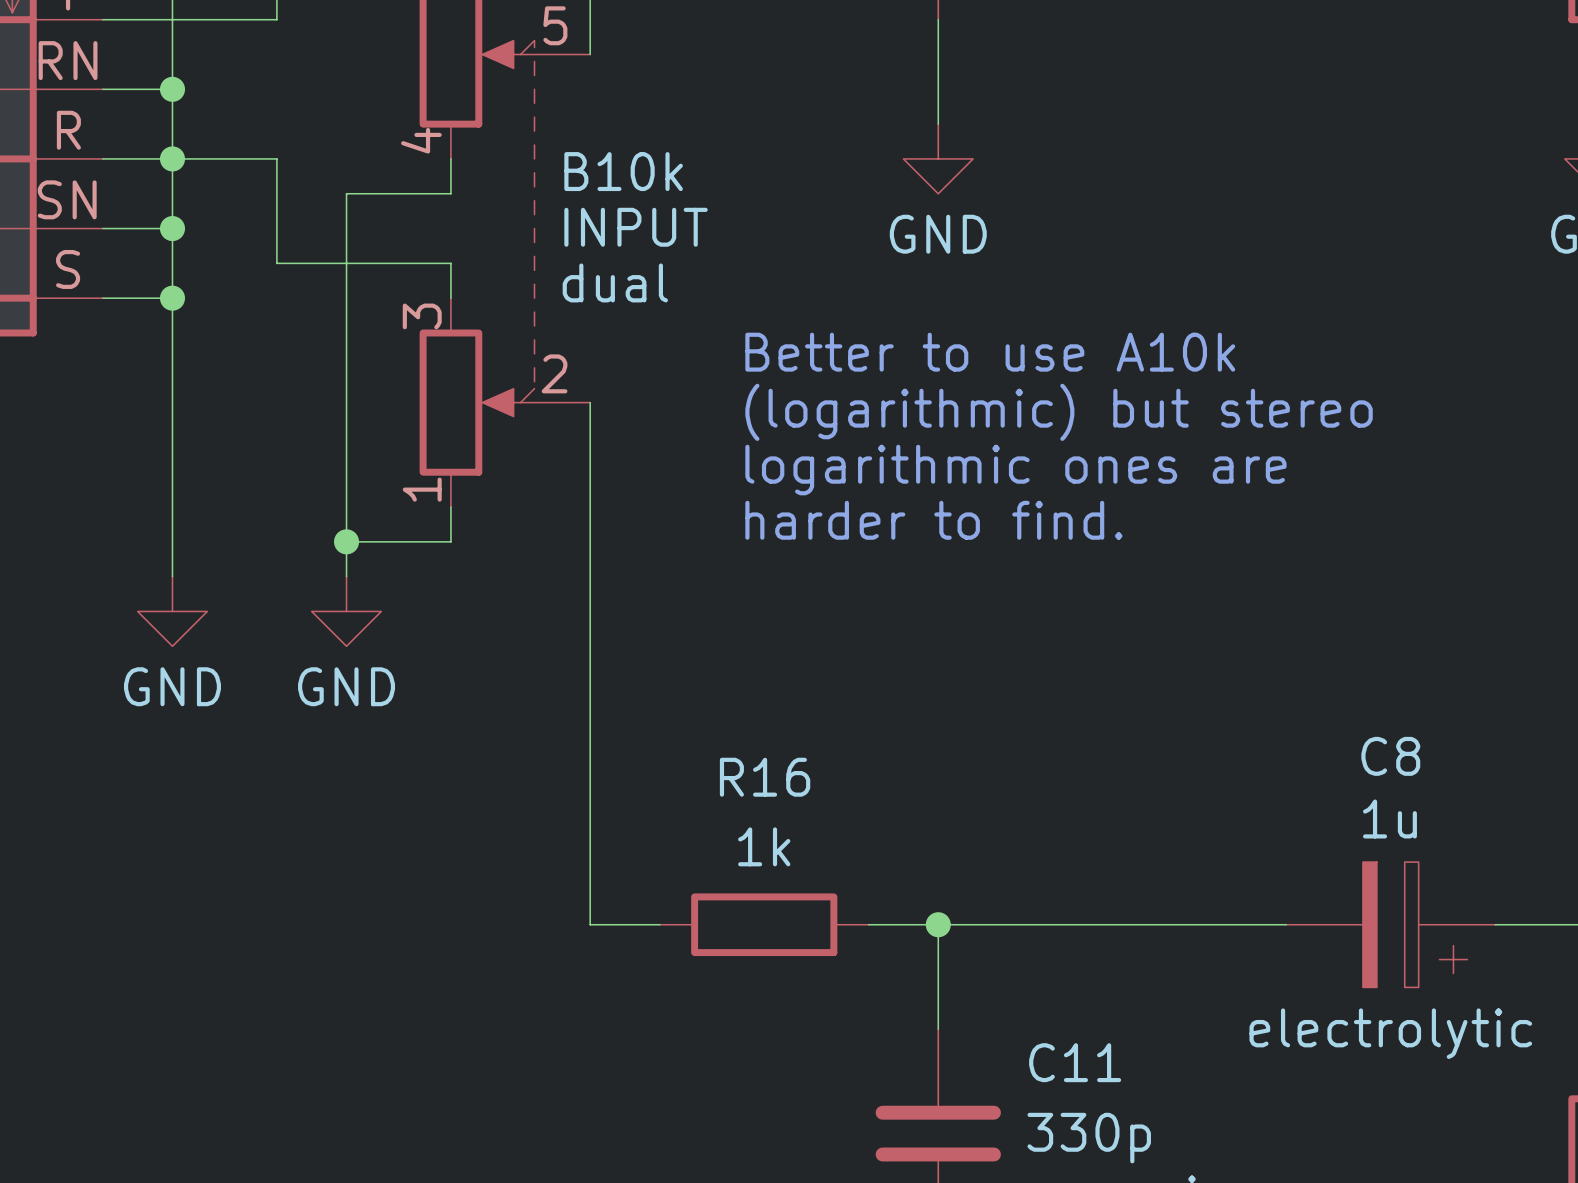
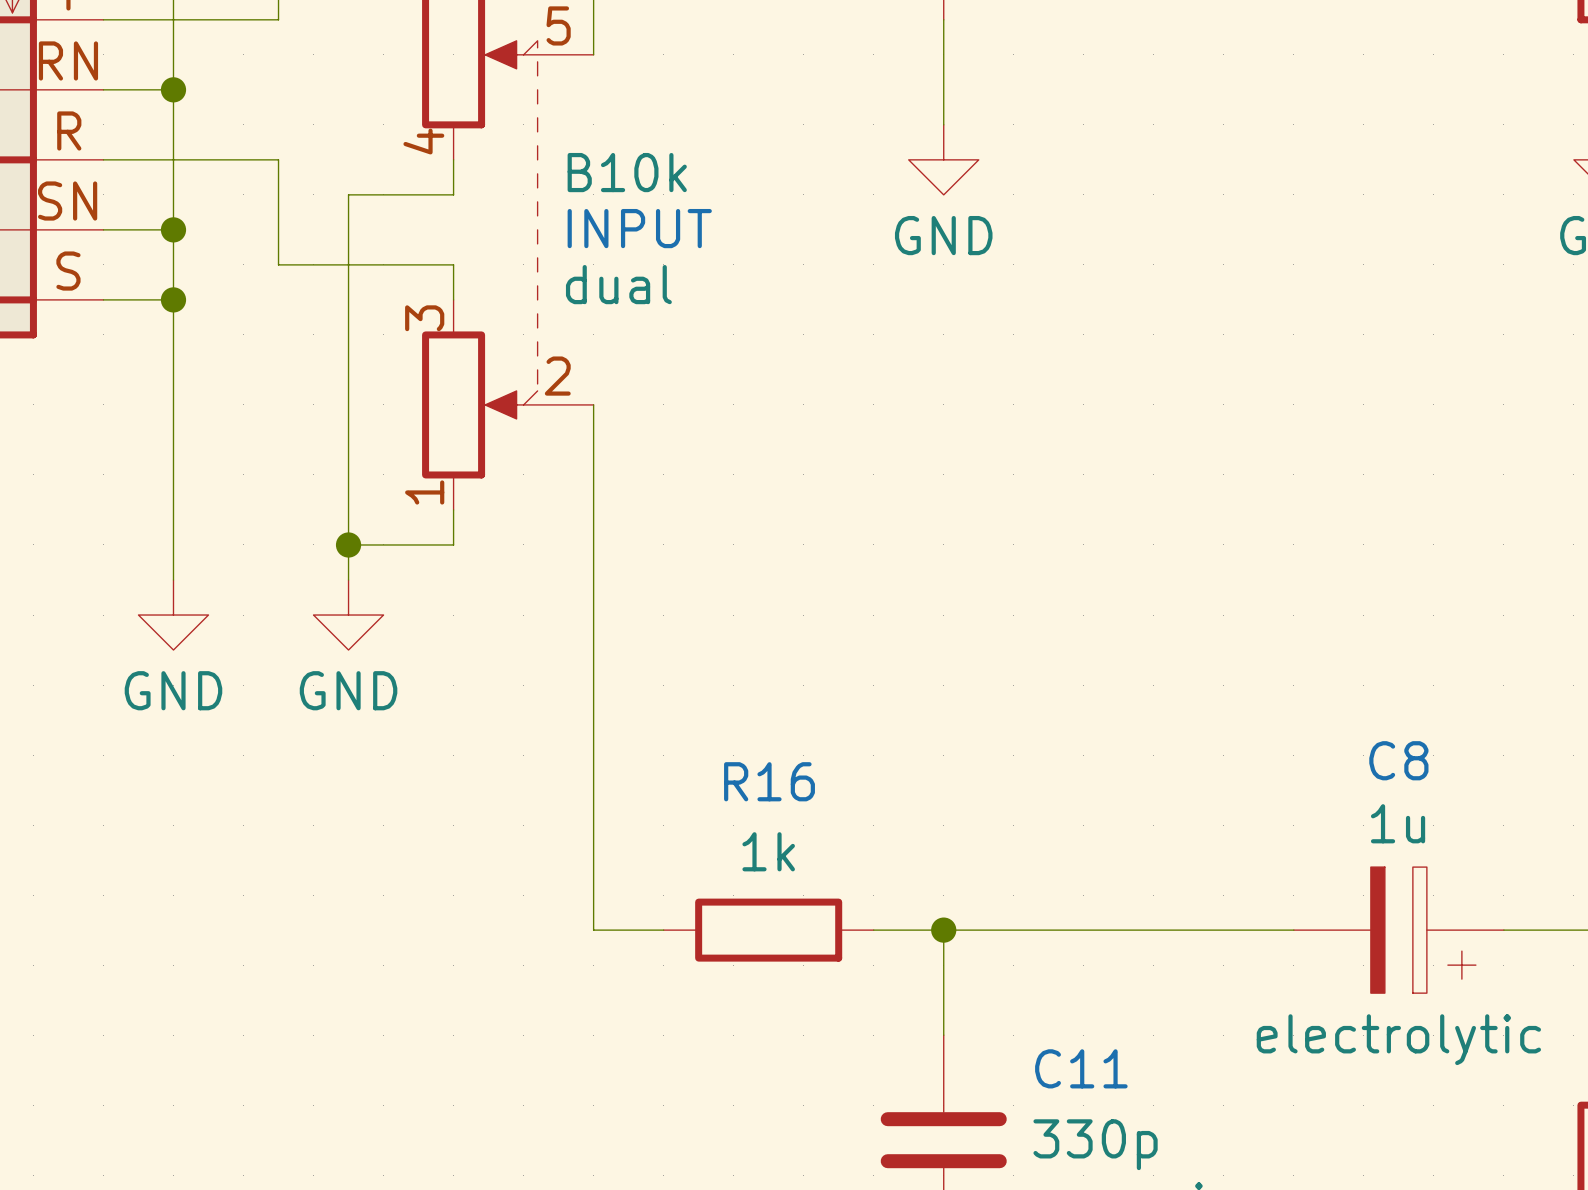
junction: (172, 158) -> none
text: Better to use A10k (990, 352) -> none
text: (logarithmic) but stereo (1059, 412) -> none
text: logarithmic ones are (1015, 470) -> none
text: harder to find. (933, 520) -> none

